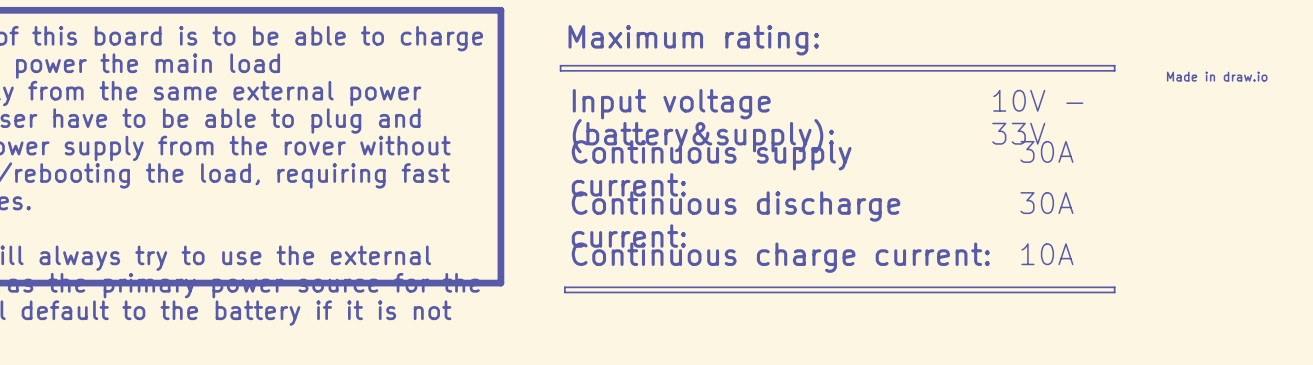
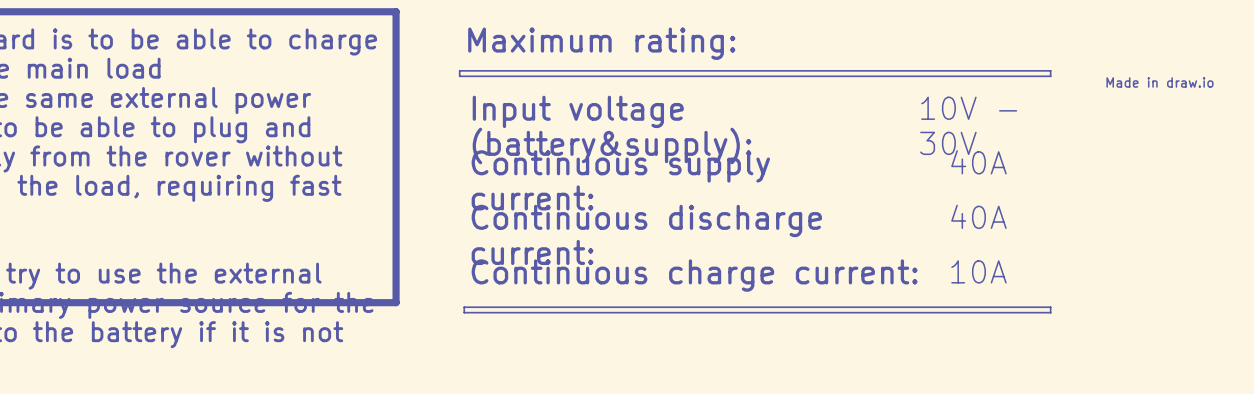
text: 33V (1018, 133) -> 30V (948, 143)
text: 30A (1046, 151) -> 40A (978, 162)
text: 30A (1046, 203) -> 40A (978, 216)

